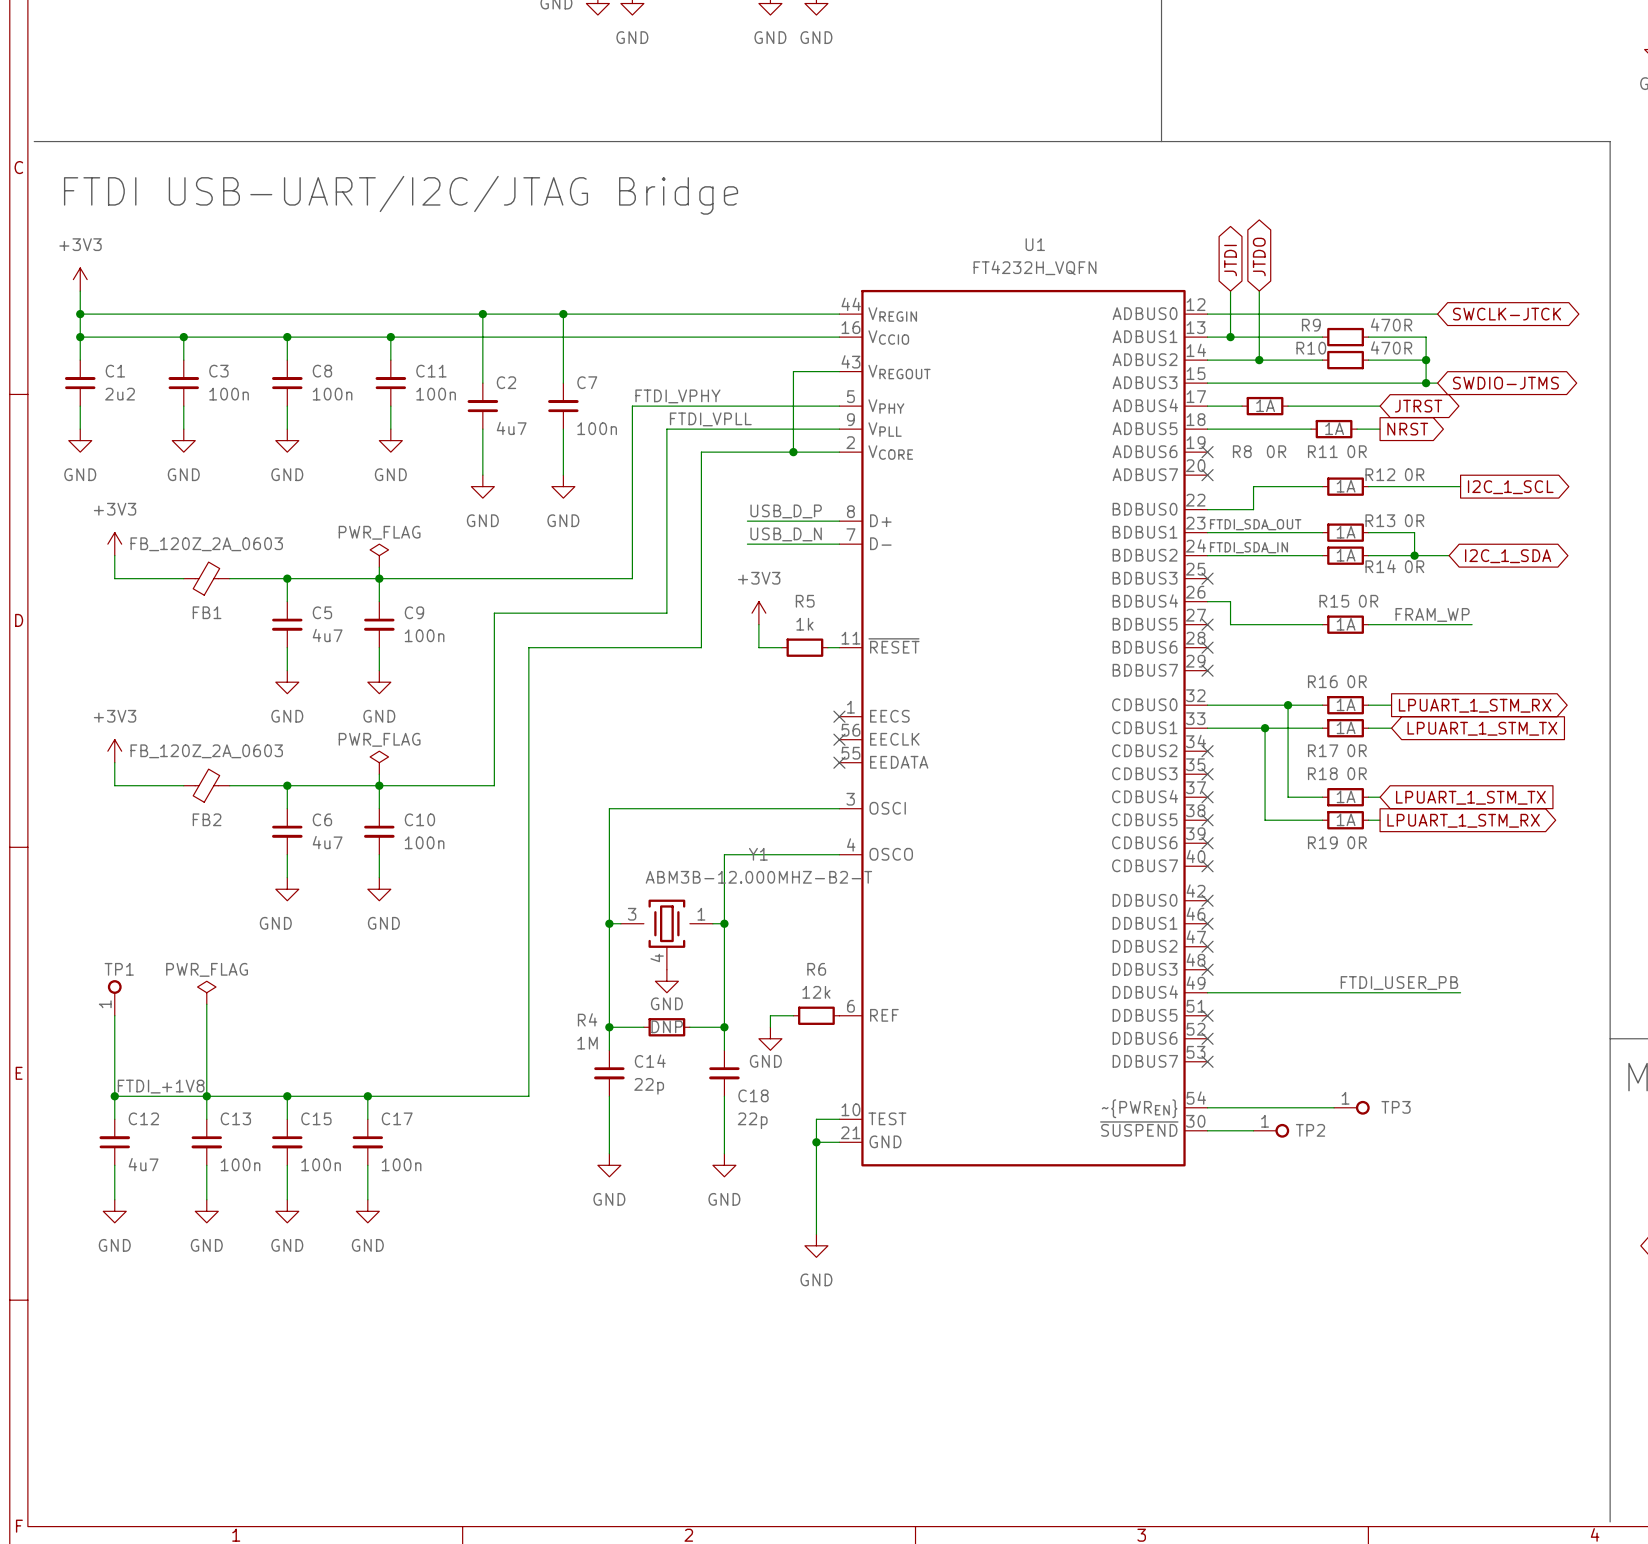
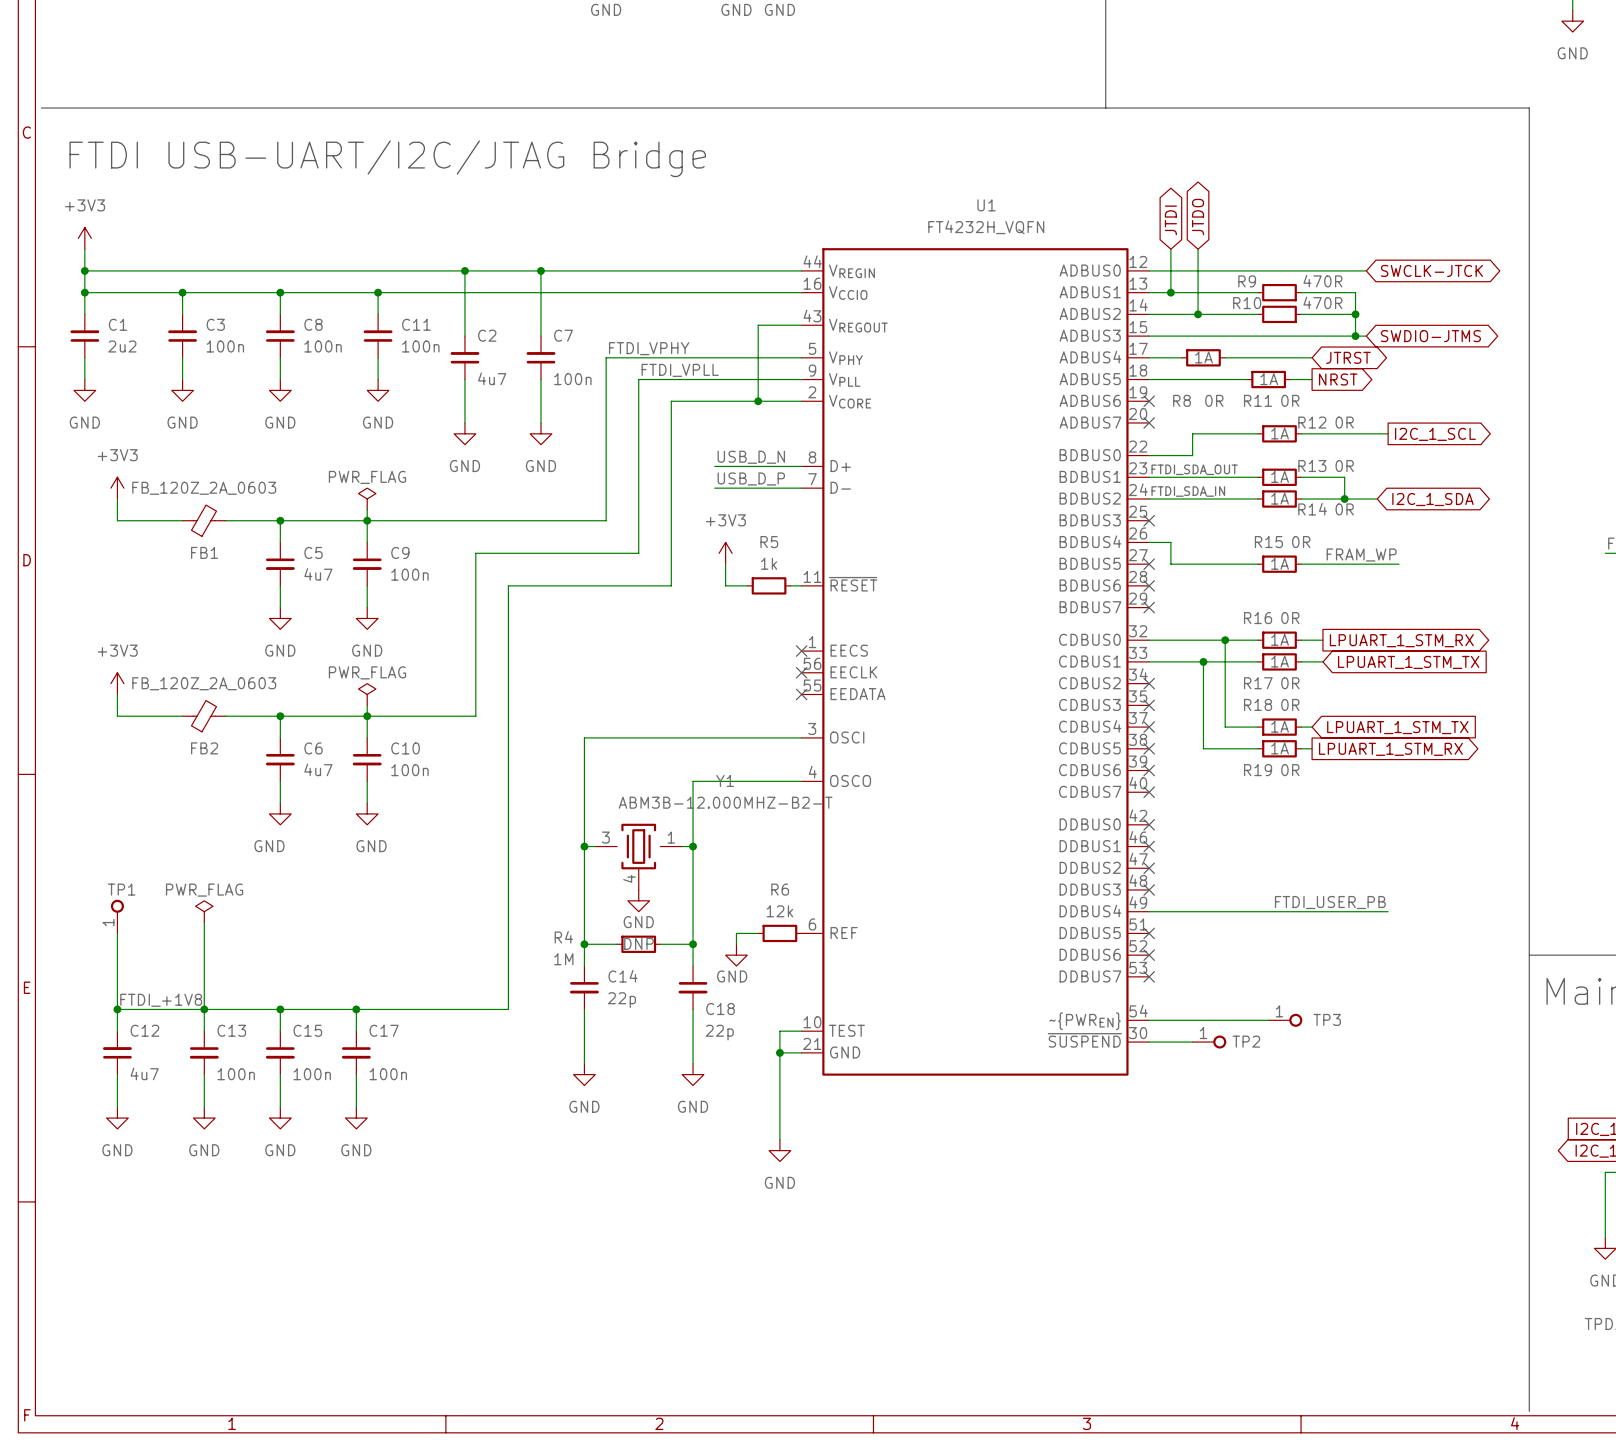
label: USB_D_P (786, 511) -> USB_D_N (751, 457)
label: USB_D_N (786, 534) -> USB_D_P (751, 478)

